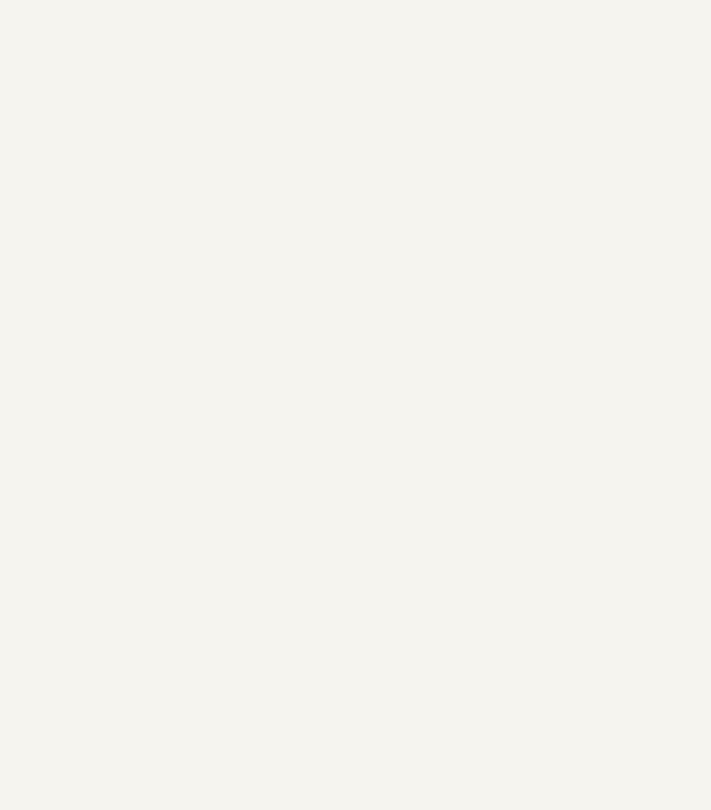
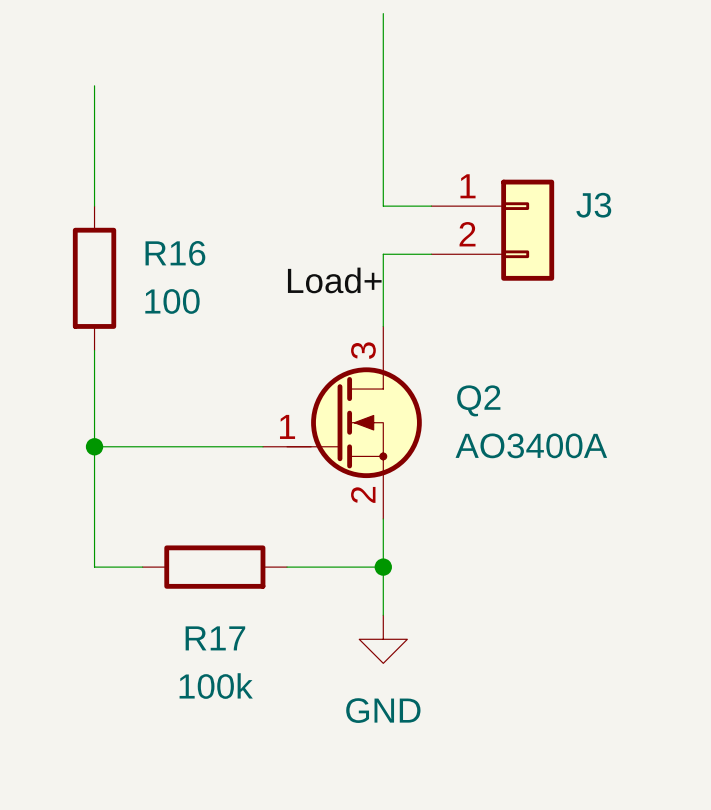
wire: none -> (383, 13) (383, 206) (431, 206)
wire: none -> (94, 85) (94, 206)
J3: none -> (492, 230)
wire: none -> (431, 254) (383, 254) (383, 326)
R16: none -> 100 (94, 278)
label: none -> Load+ (334, 280)
wire: none -> (94, 350) (94, 567) (142, 567)
Q2: none -> AO3400A (342, 422)
wire: none -> (94, 446) (262, 446)
junction: none -> (94, 446)
wire: none -> (383, 518) (383, 615)
R17: none -> 100k (214, 567)
wire: none -> (287, 567) (383, 567)
junction: none -> (383, 567)
power symbol: none -> GND (383, 639)

